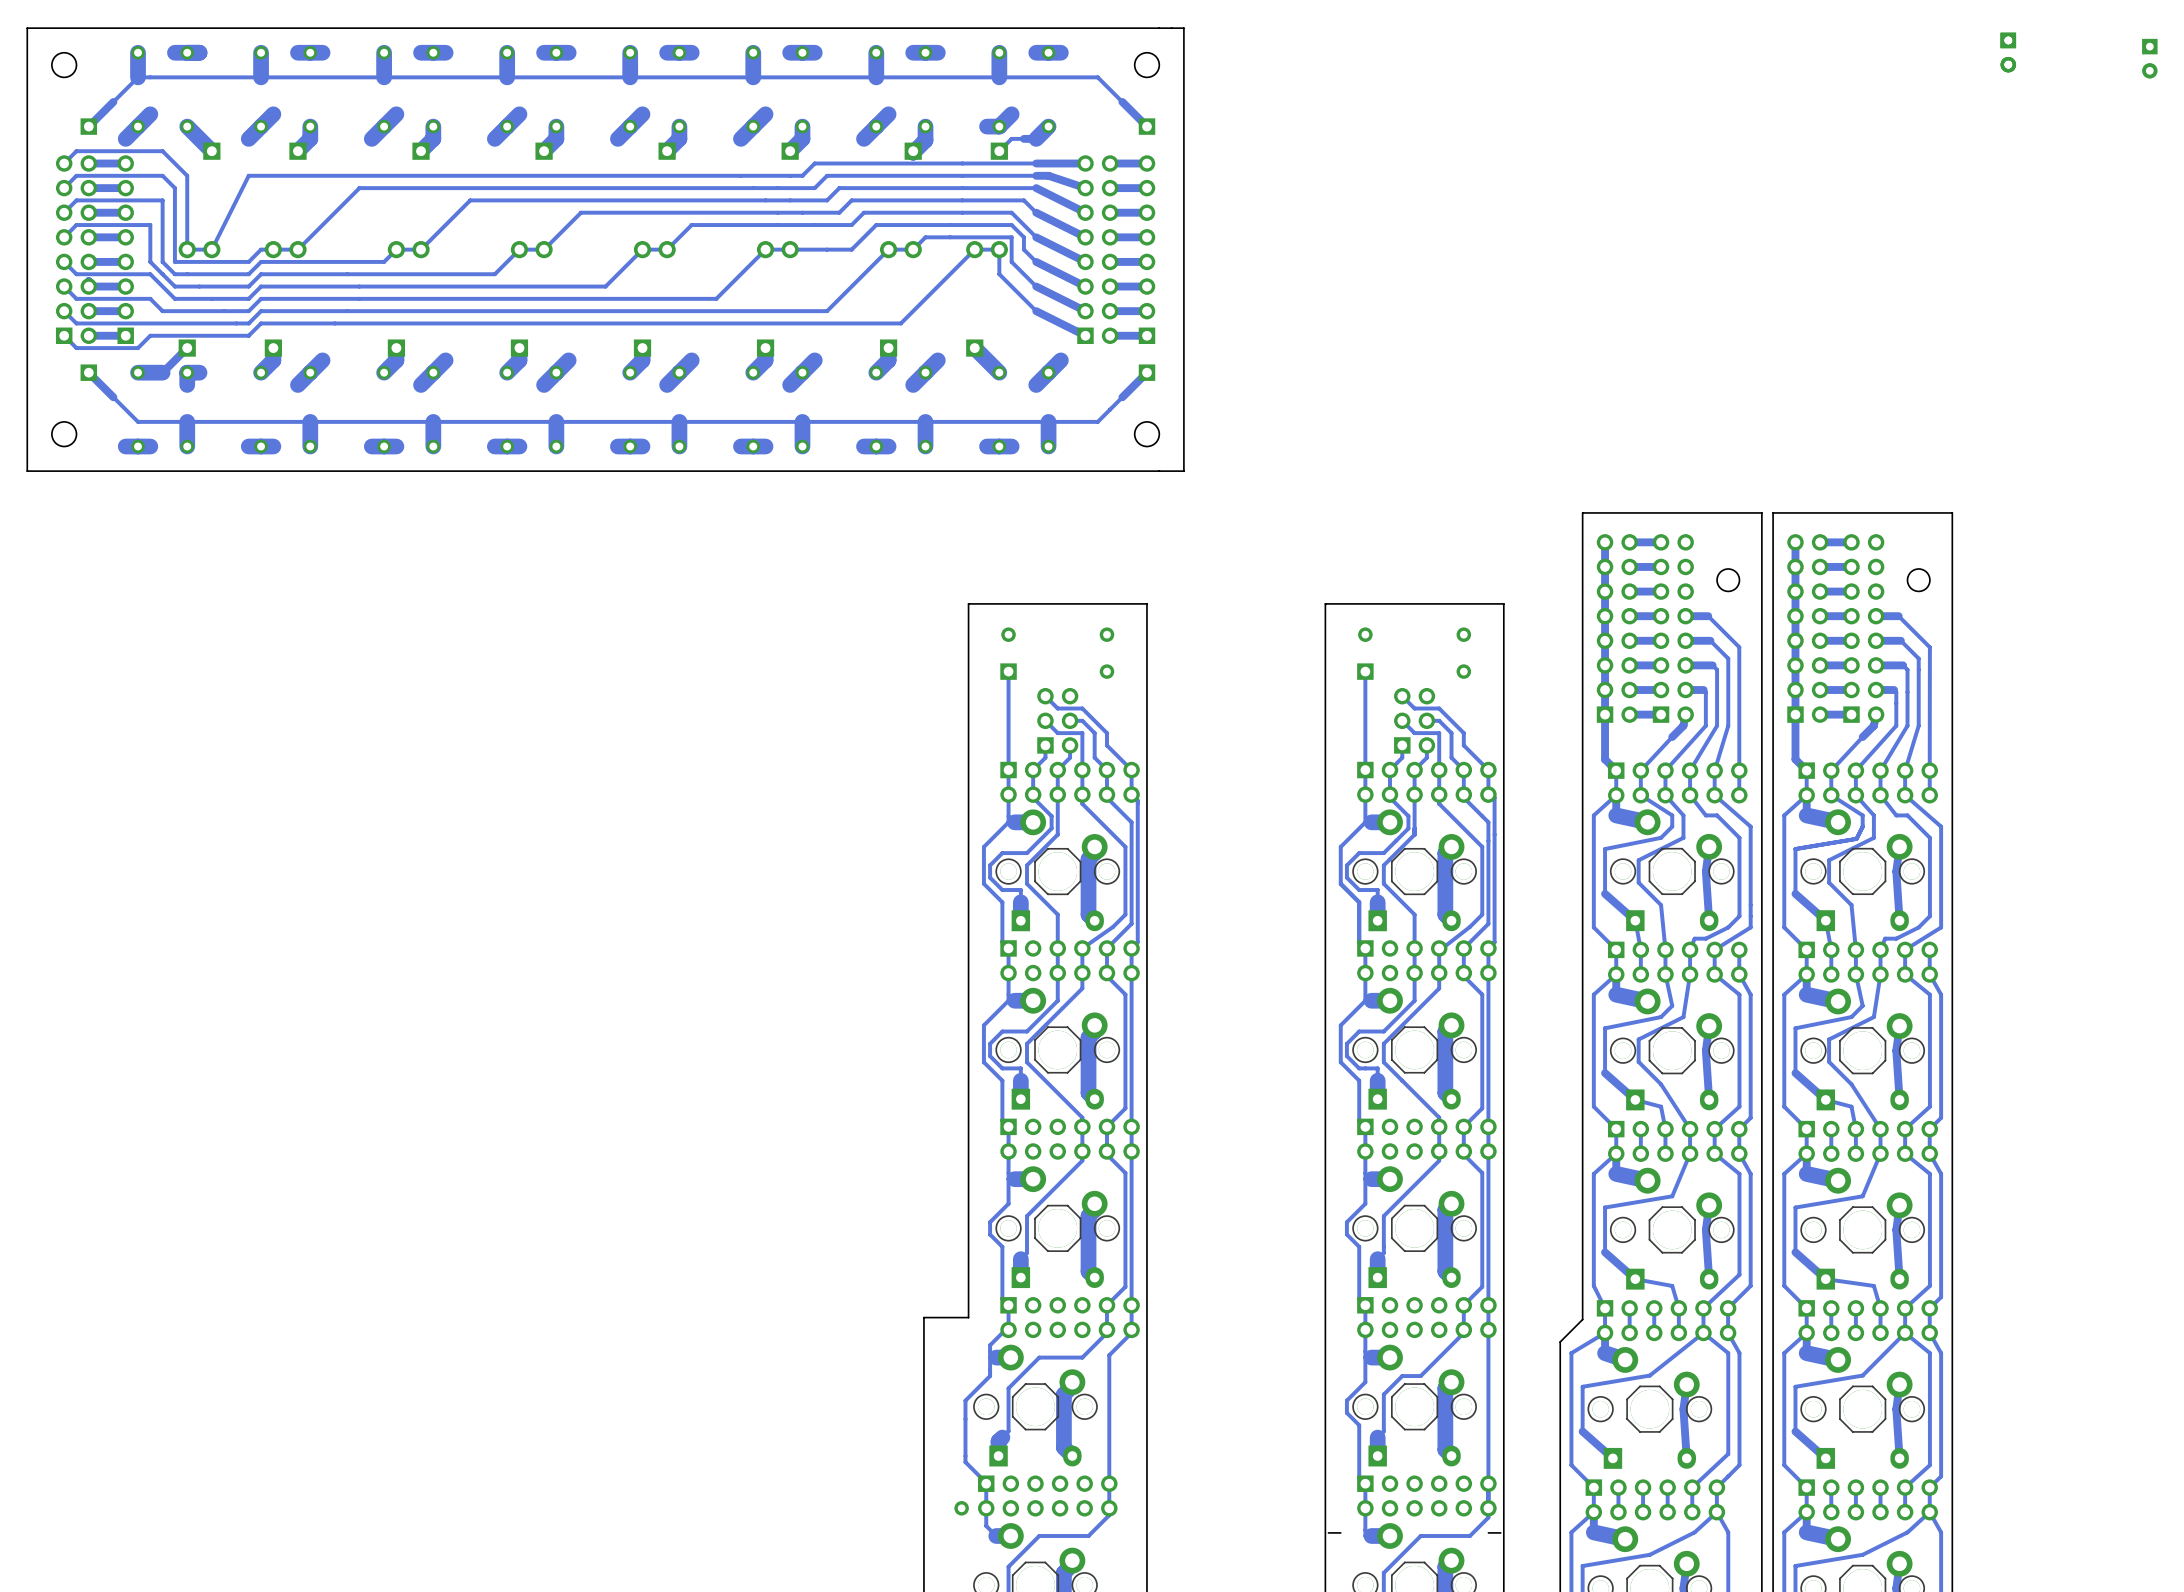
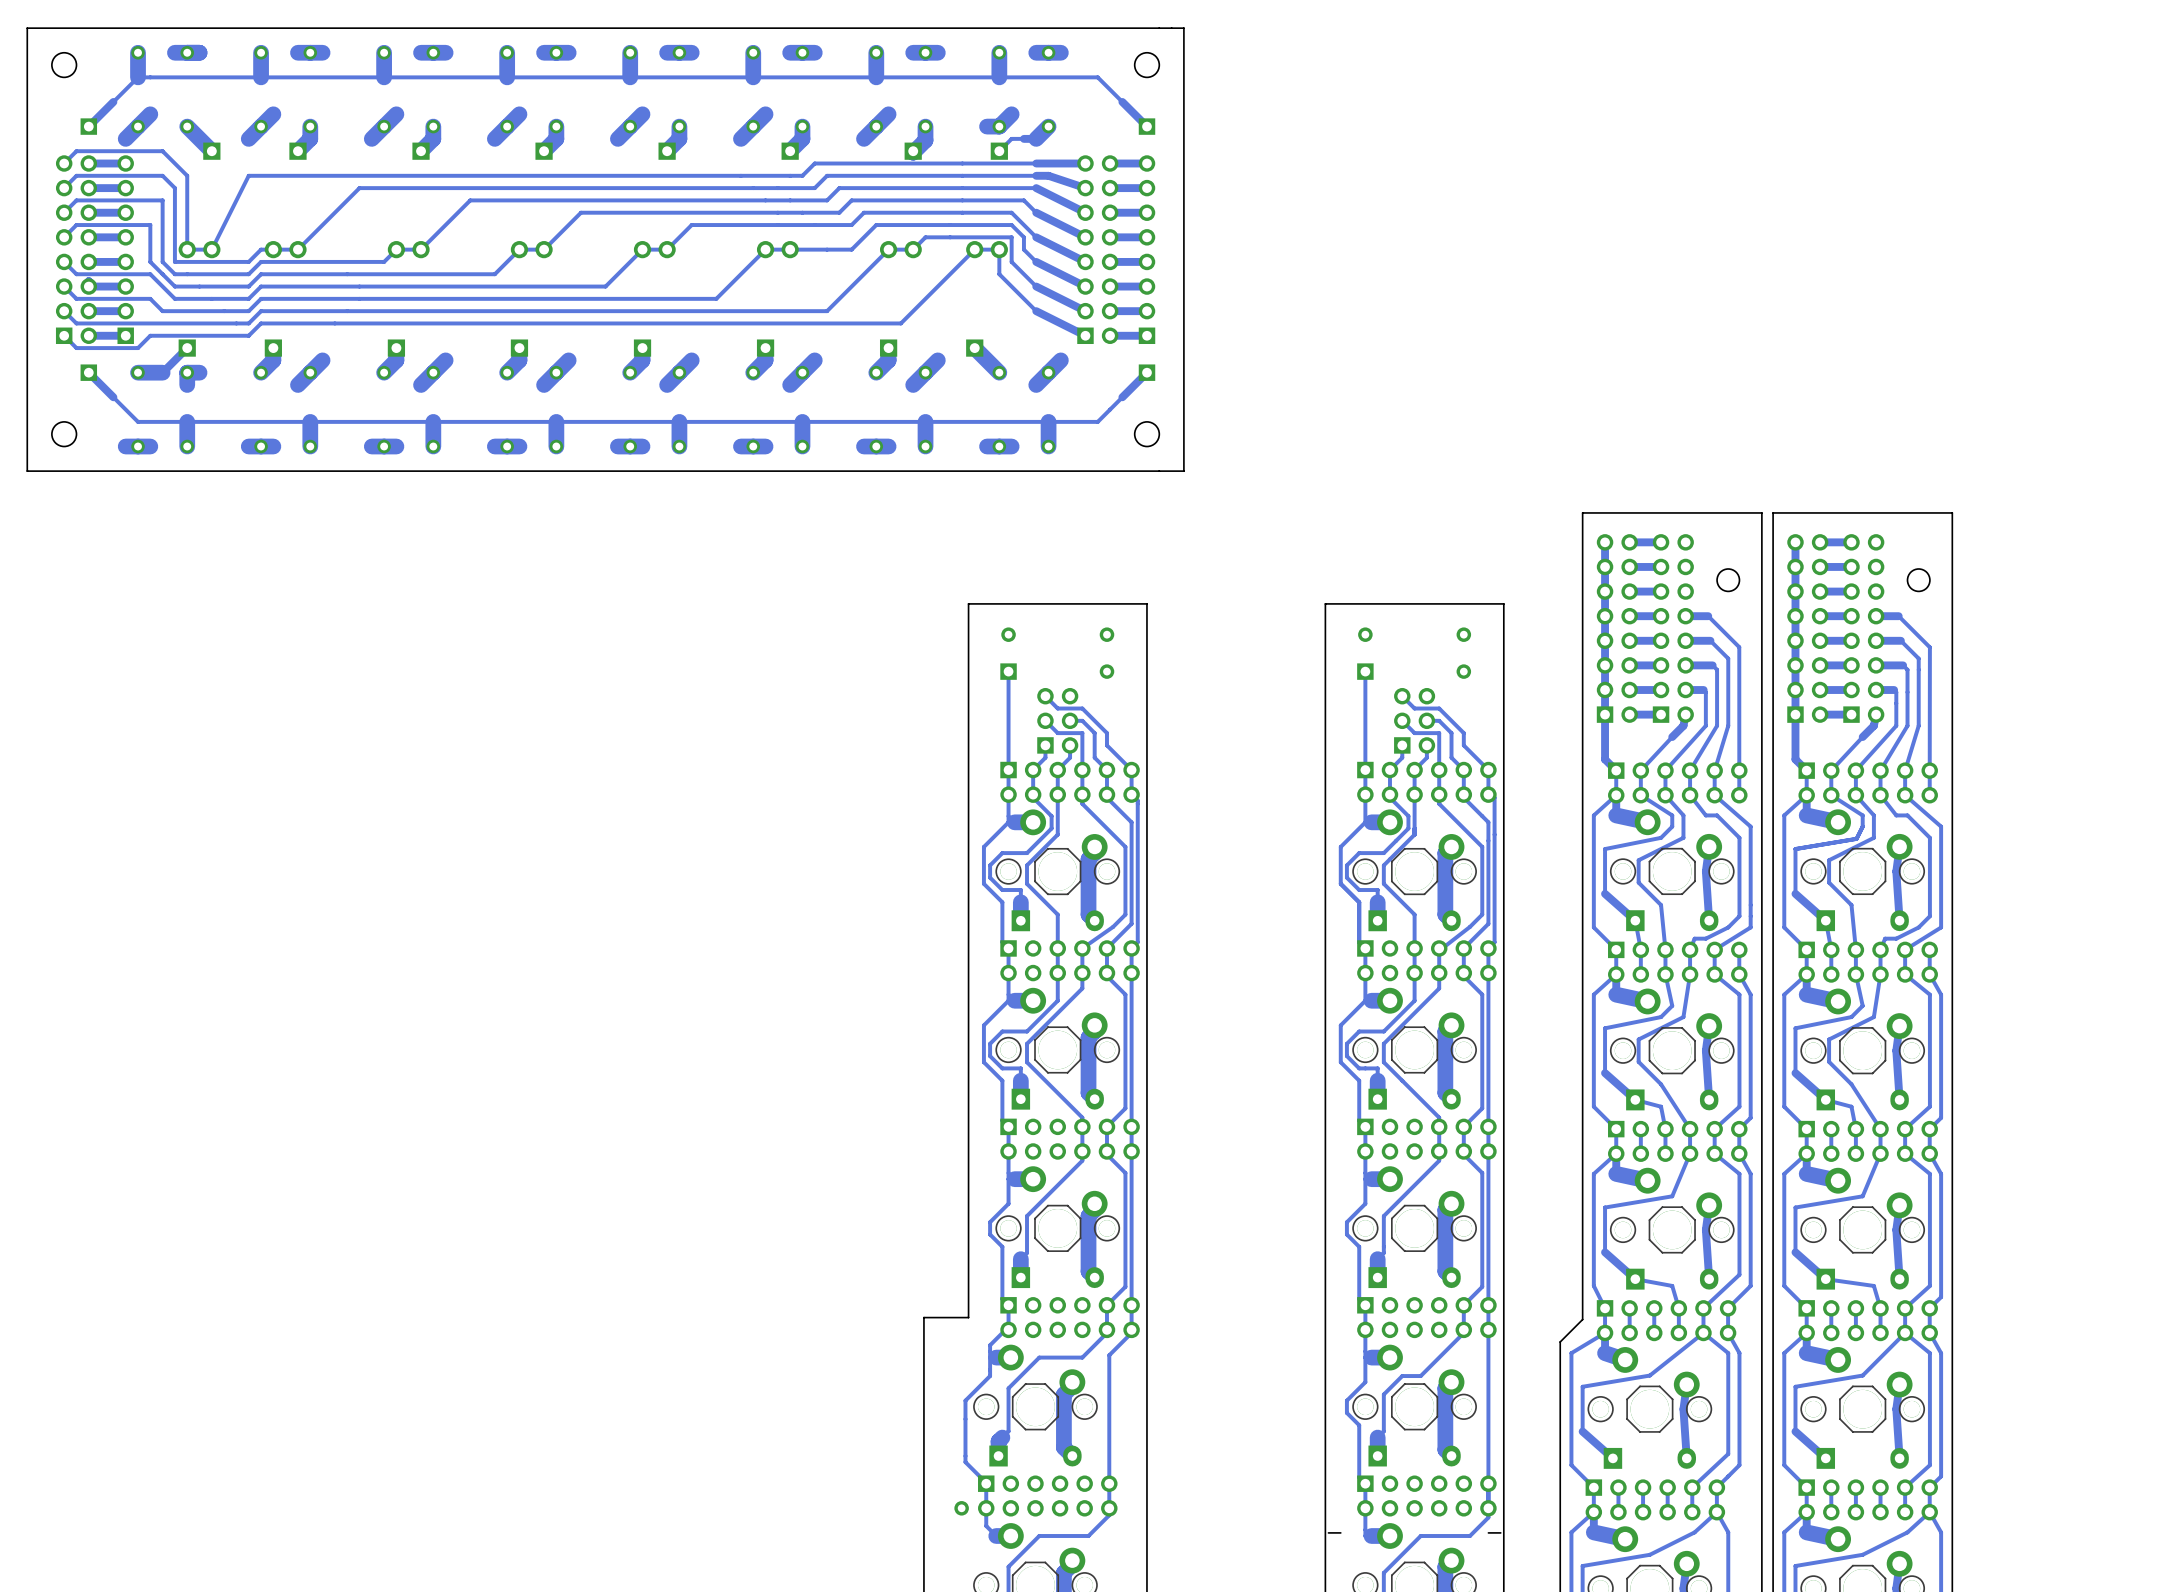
part: (2008, 52) -> none
part: (2149, 58) -> none

